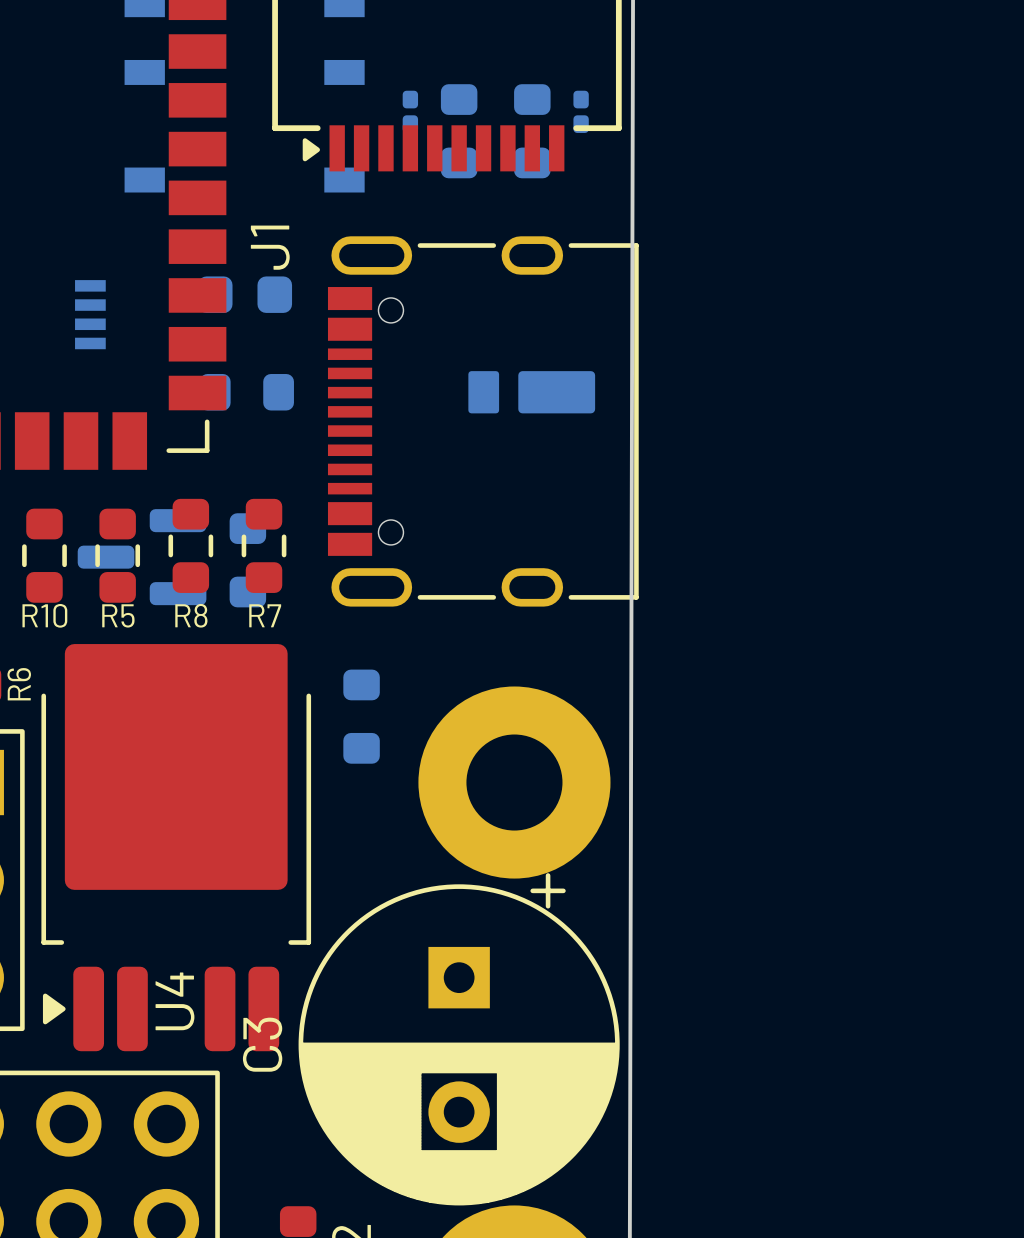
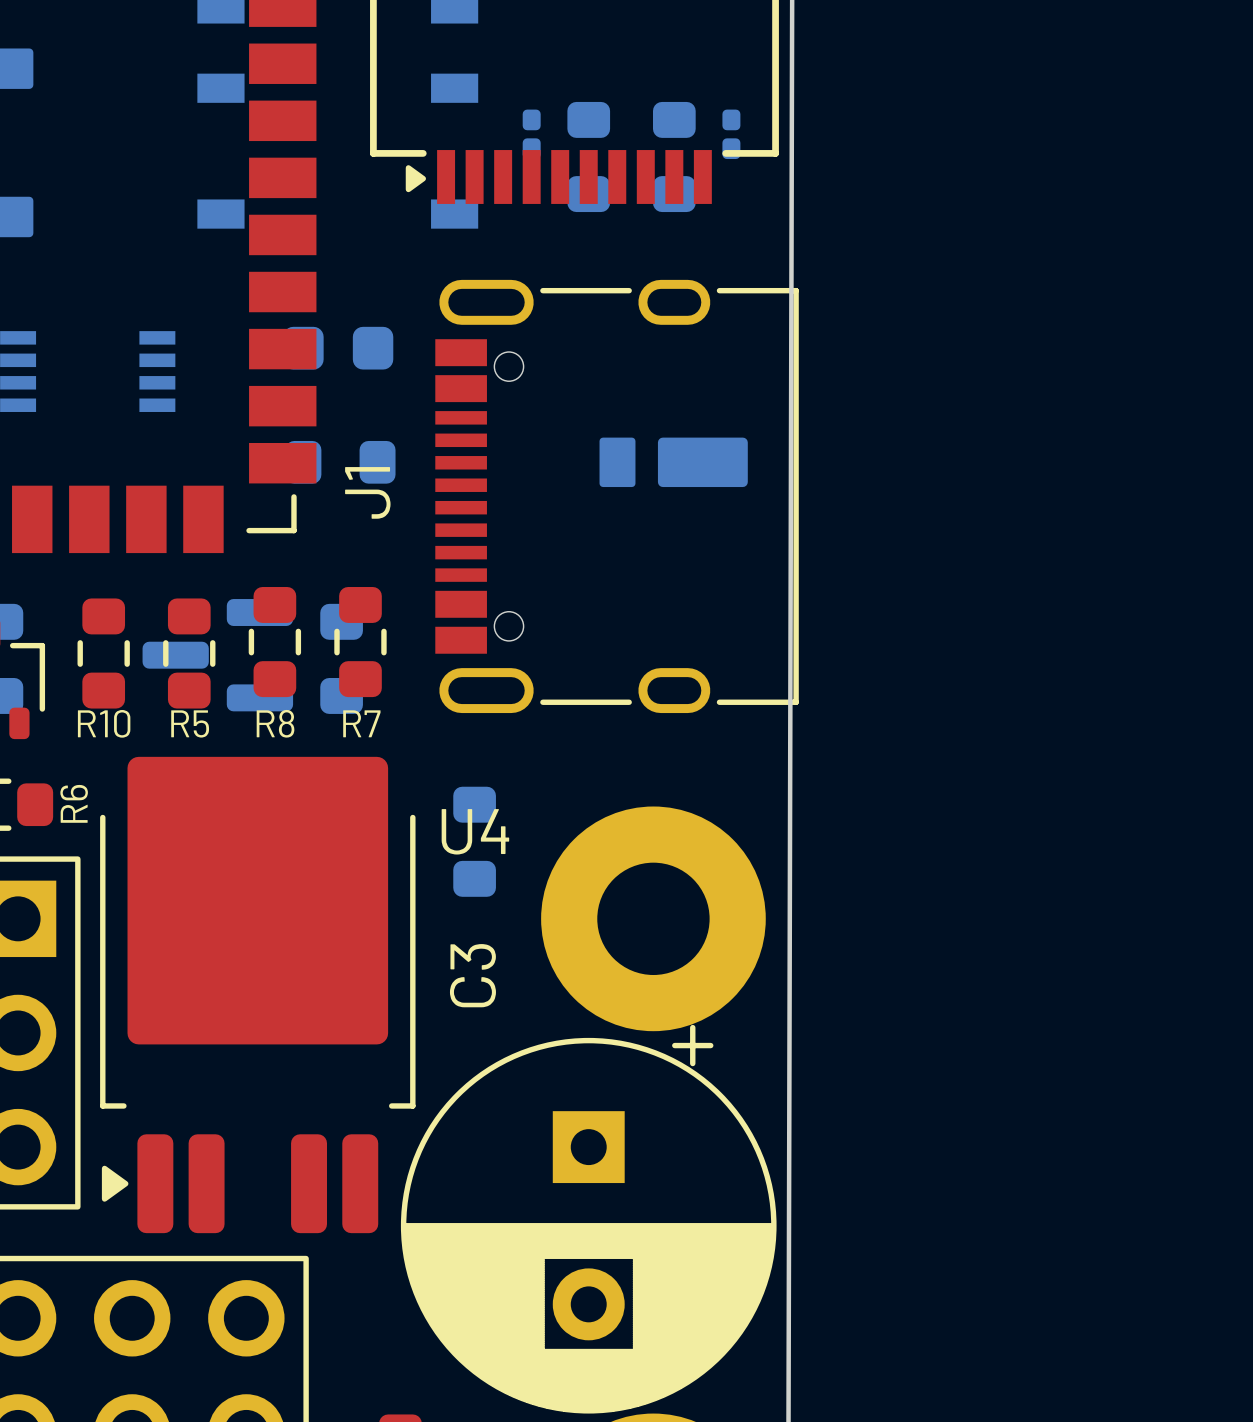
J1 name position: J1 (270, 247) -> J1 (367, 492)
U4 name rotation: 0° (174, 1001) -> 90° clockwise (475, 831)
U4 name position: U4 (174, 1001) -> U4 (475, 831)
C3 name position: C3 (262, 1044) -> C3 (472, 975)

